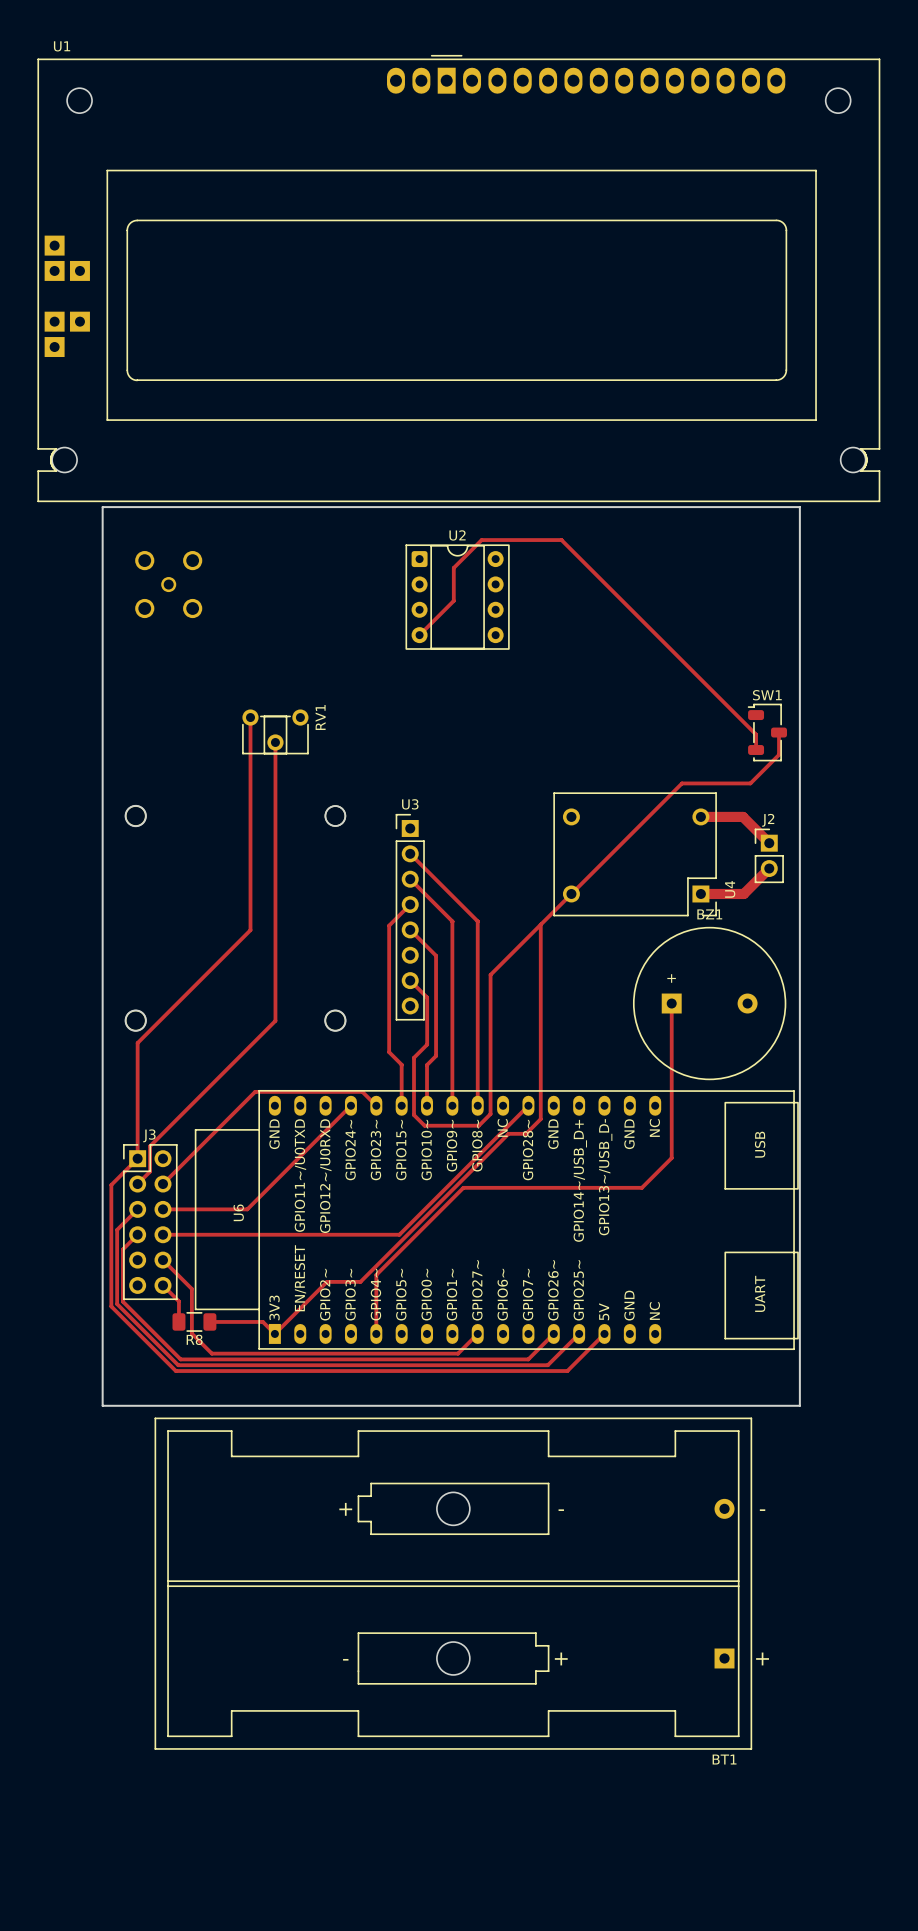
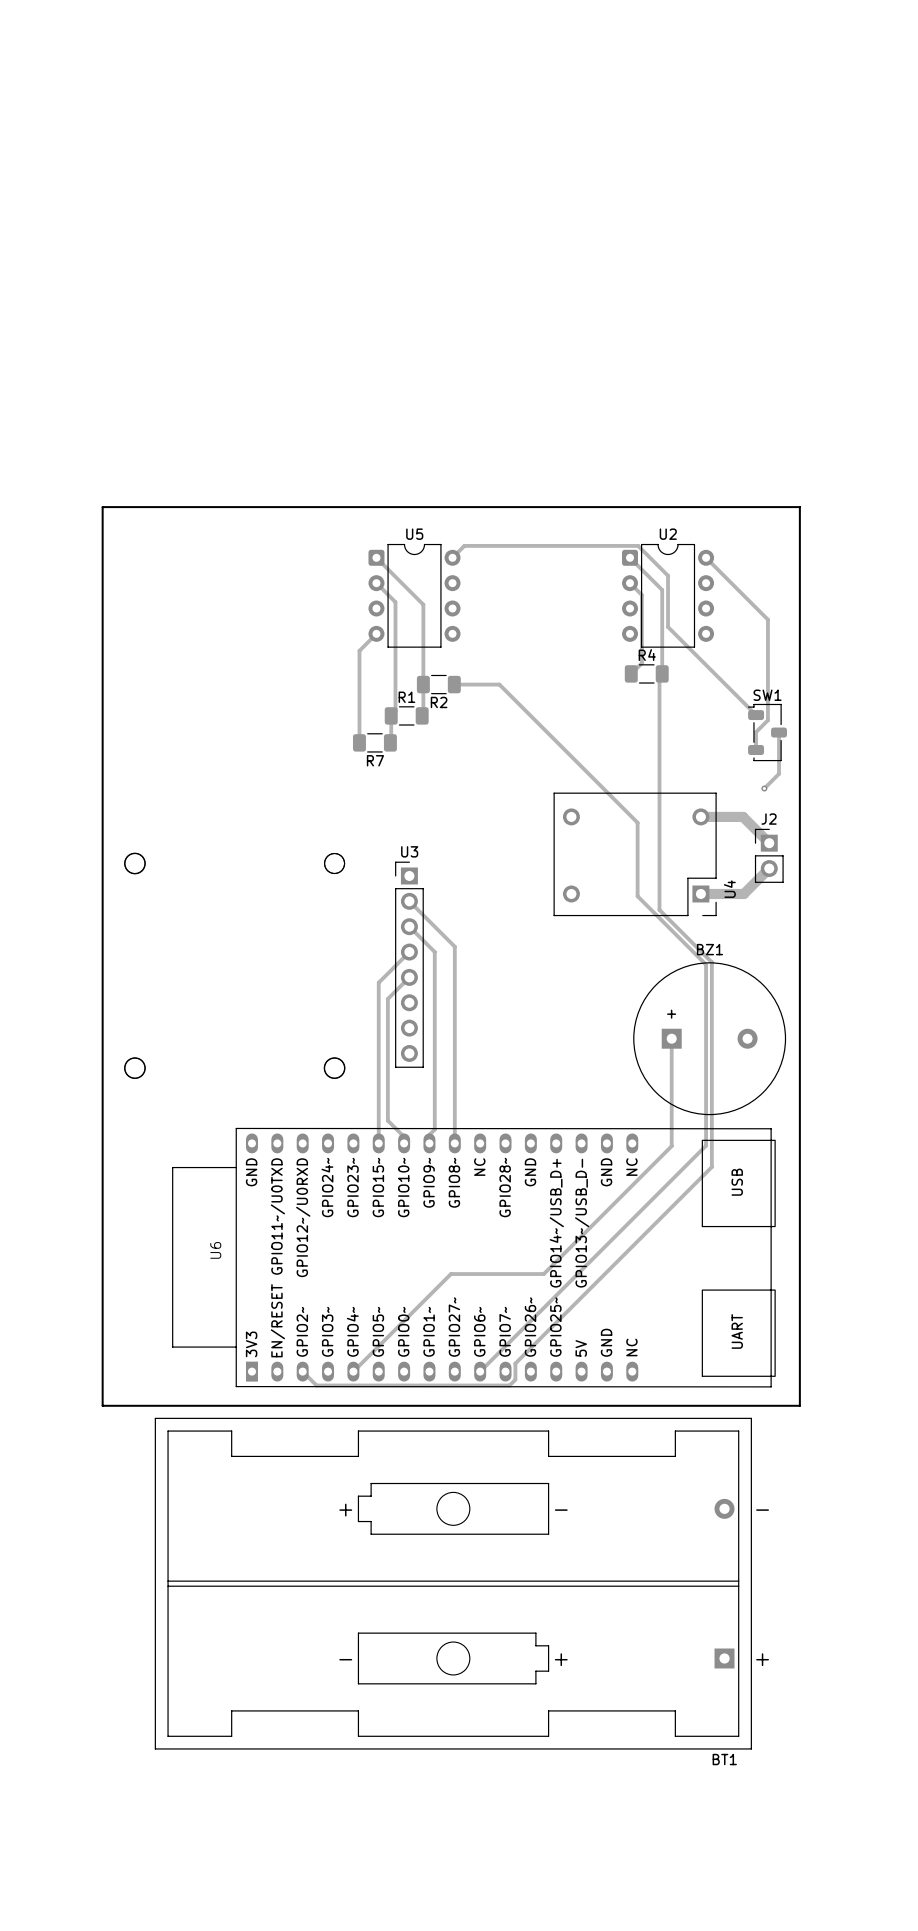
U1: (458, 278) -> none
U2 footprint: [405, 544, 510, 650] -> [622, 543, 715, 648]
track: none -> (376, 557) (423, 604) (422, 715)
track: none -> (452, 557) (464, 545) (638, 545) (668, 575) (668, 627) (756, 715)
track: none -> (630, 557) (662, 590) (662, 677) (659, 680) (659, 909) (711, 962) (711, 1167) (515, 1363) (515, 1379) (509, 1385) (316, 1385) (302, 1371)
track: none -> (376, 583) (395, 602) (395, 711) (391, 715) (390, 742)
track: none -> (630, 583) (641, 595) (641, 663) (631, 673)
part: (168, 584) -> none
U5: none -> (414, 595)
track: none -> (376, 633) (359, 650) (359, 742)
track: (419, 635) (453, 600) (453, 567) (481, 540) (561, 540) (756, 734) -> (706, 557) (767, 619) (767, 720) (756, 732) (756, 734)
R4: none -> (646, 673)
R2: none -> (438, 684)
track: none -> (454, 684) (499, 684) (637, 822) (637, 896) (706, 964) (706, 1145) (480, 1371)
R1: none -> (406, 715)
track: (250, 717) (250, 930) (137, 1043) (137, 1158) (111, 1184) (111, 1306) (175, 1371) (567, 1371) (604, 1333) -> none
RV1: (275, 731) -> none
track: (275, 742) (275, 1020) (150, 1146) (150, 1171) (137, 1184) -> none
R7: none -> (374, 742)
track: (779, 754) (750, 783) (681, 783) (490, 974) (490, 1114) (478, 1125) (424, 1125) (414, 1115) (414, 1057) (427, 1044) (427, 997) (410, 980) -> (779, 754) (779, 773) (764, 788)
via: none -> (764, 788)
track: (410, 853) (477, 921) (477, 1105) -> none
track: (410, 879) (452, 921) (452, 1105) -> none
track: none -> (409, 901) (454, 946) (454, 1143)
track: (410, 904) (389, 925) (389, 1052) (401, 1064) (401, 1105) -> none
U3 position: (274, 918) -> (274, 965)
track: (540, 924) (540, 1119) (526, 1133) (508, 1133) (360, 1281) (326, 1281) (274, 1333) (262, 1321) (209, 1321) -> none
track: none -> (409, 926) (434, 952) (434, 1129) (429, 1134) (429, 1143)
track: (410, 929) (436, 955) (436, 1056) (427, 1065) (427, 1105) -> none
track: none -> (409, 952) (378, 982) (378, 1143)
track: none -> (409, 977) (387, 998) (387, 1120) (404, 1136) (404, 1143)
track: (671, 1003) (671, 1038) -> none
BZ1 position: (709, 1003) -> (709, 1038)
track: (350, 1105) (247, 1209) (163, 1209) -> none
track: (376, 1105) (362, 1091) (255, 1091) (163, 1184) -> none
track: (528, 1105) (399, 1234) (163, 1234) -> none
track: (671, 1146) (671, 1158) (641, 1187) (463, 1187) (376, 1274) (376, 1333) -> (671, 1146) (543, 1274) (450, 1274) (353, 1371)
track: (137, 1209) (117, 1229) (117, 1304) (178, 1365) (547, 1365) (579, 1333) -> none
U6 position: (496, 1220) -> (473, 1257)
J3: (150, 1222) -> none
track: (137, 1234) (122, 1249) (122, 1301) (180, 1359) (528, 1359) (553, 1333) -> none
track: (163, 1260) (191, 1289) (191, 1333) (211, 1353) (458, 1353) (477, 1333) -> none
track: (163, 1285) (178, 1301) (178, 1321) -> none
R8: (194, 1321) -> none

